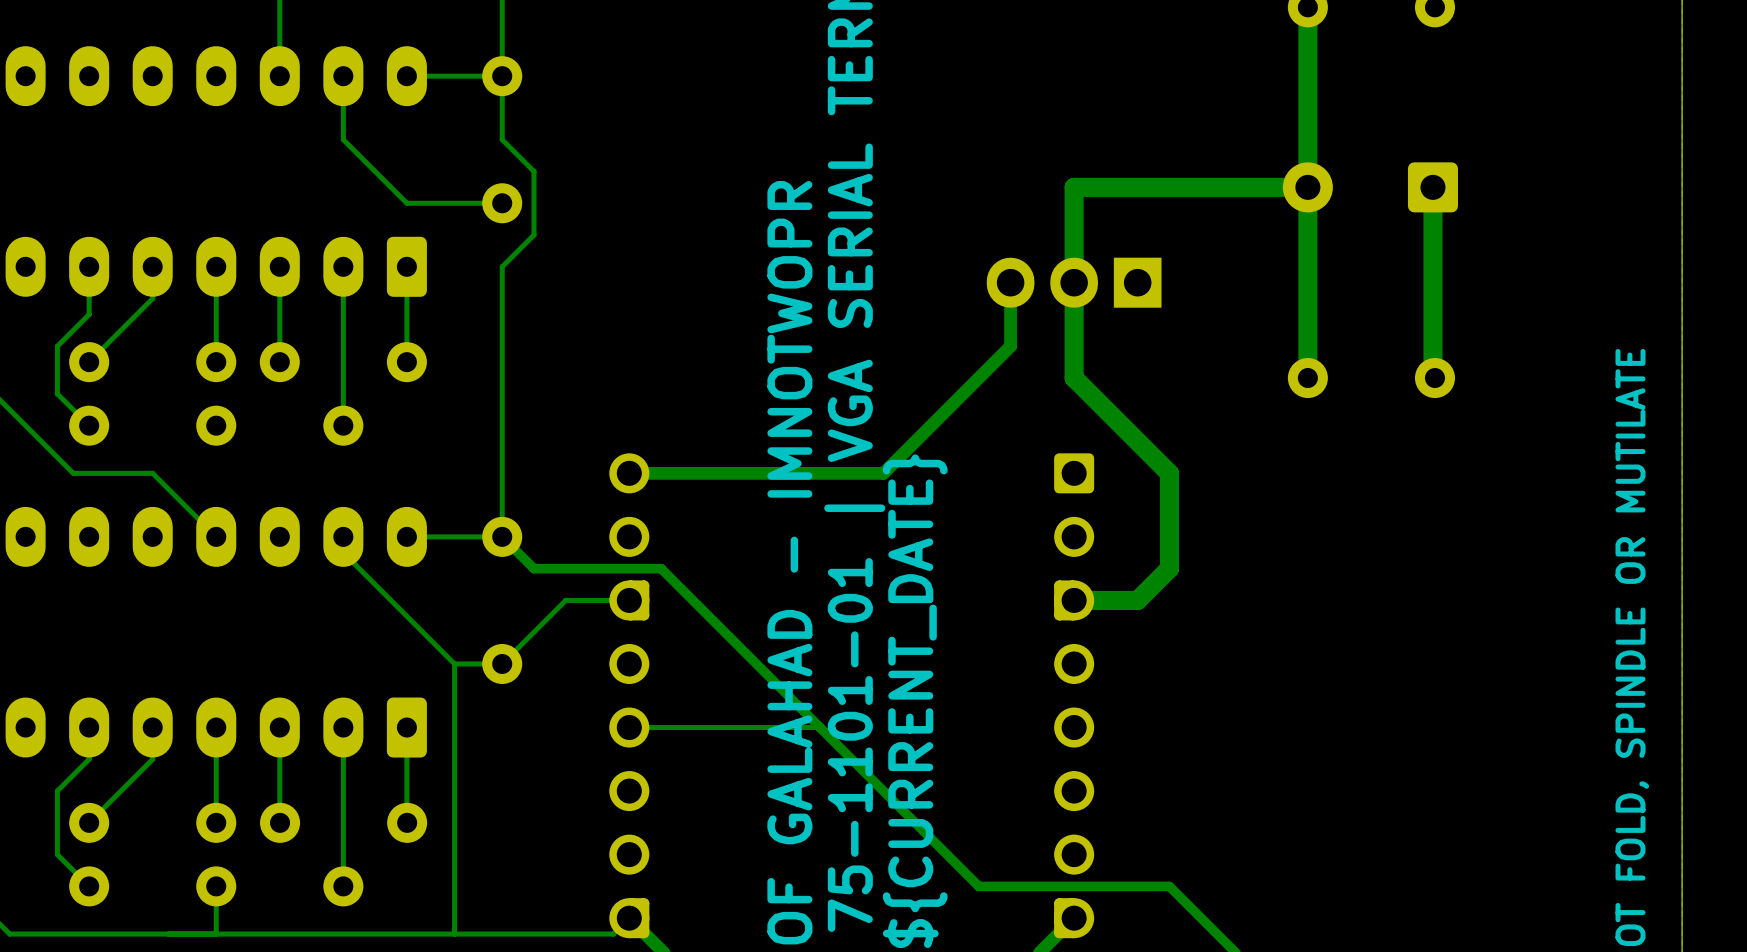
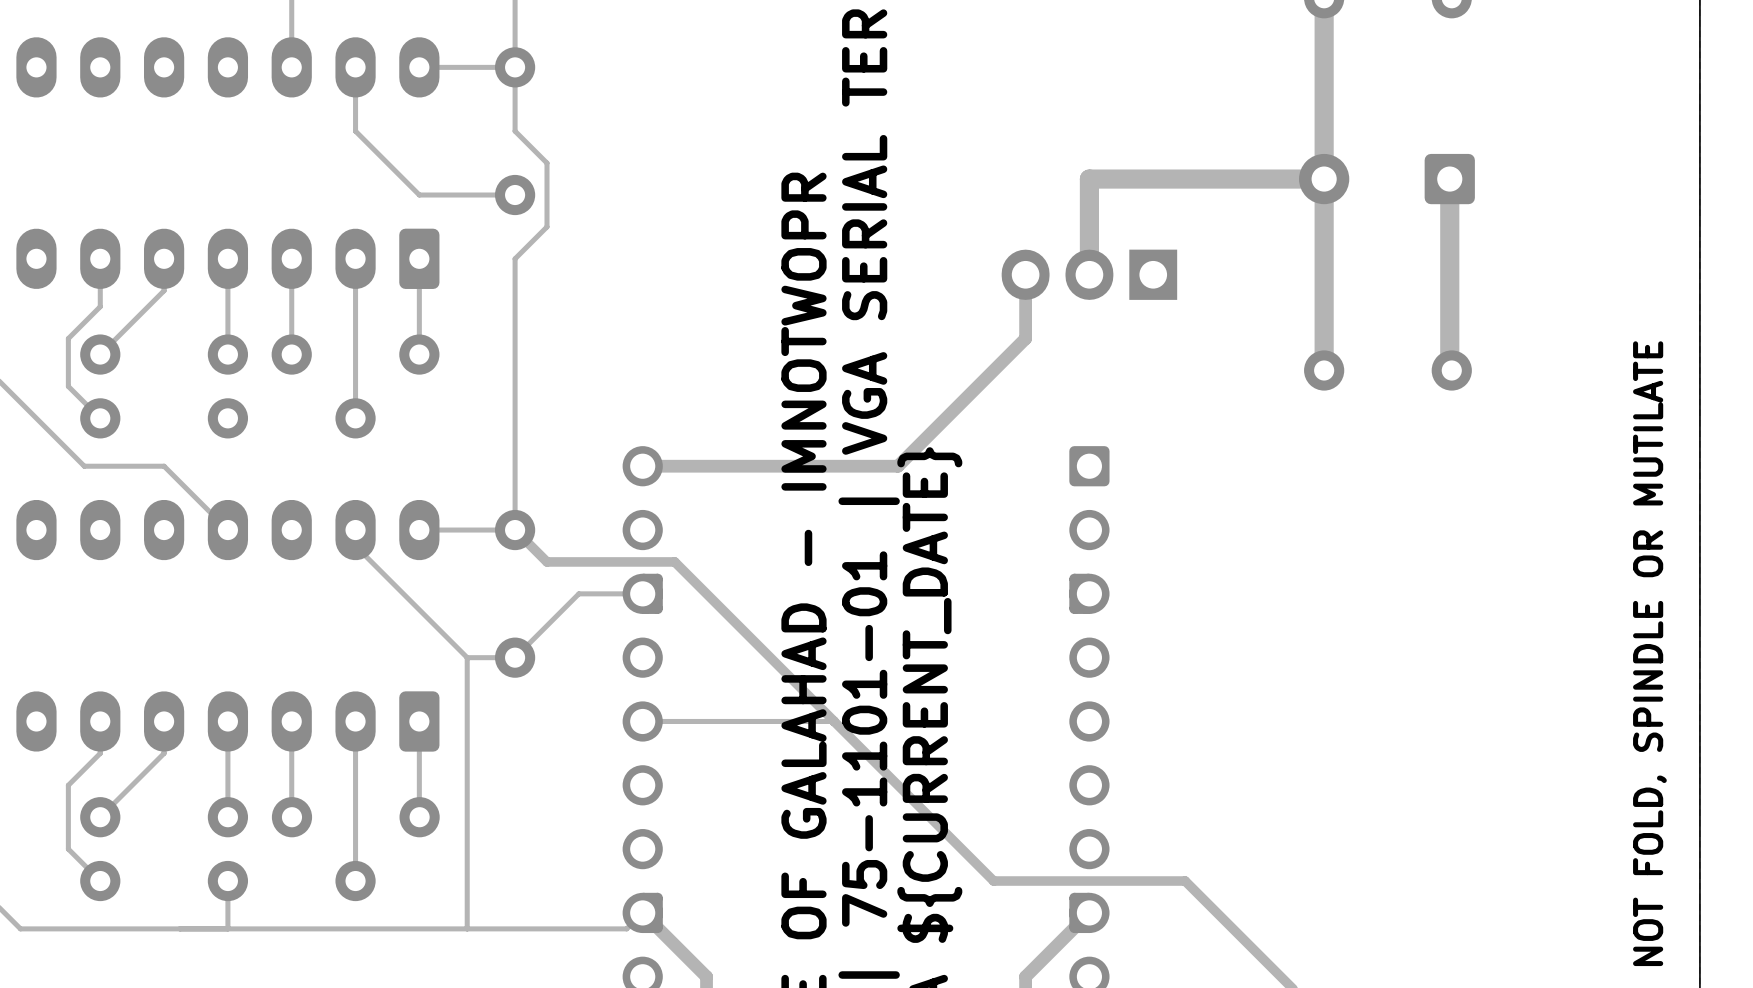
track: (1074, 282) (1074, 378) (1169, 473) (1169, 568) (1137, 600) (1074, 600) -> none

